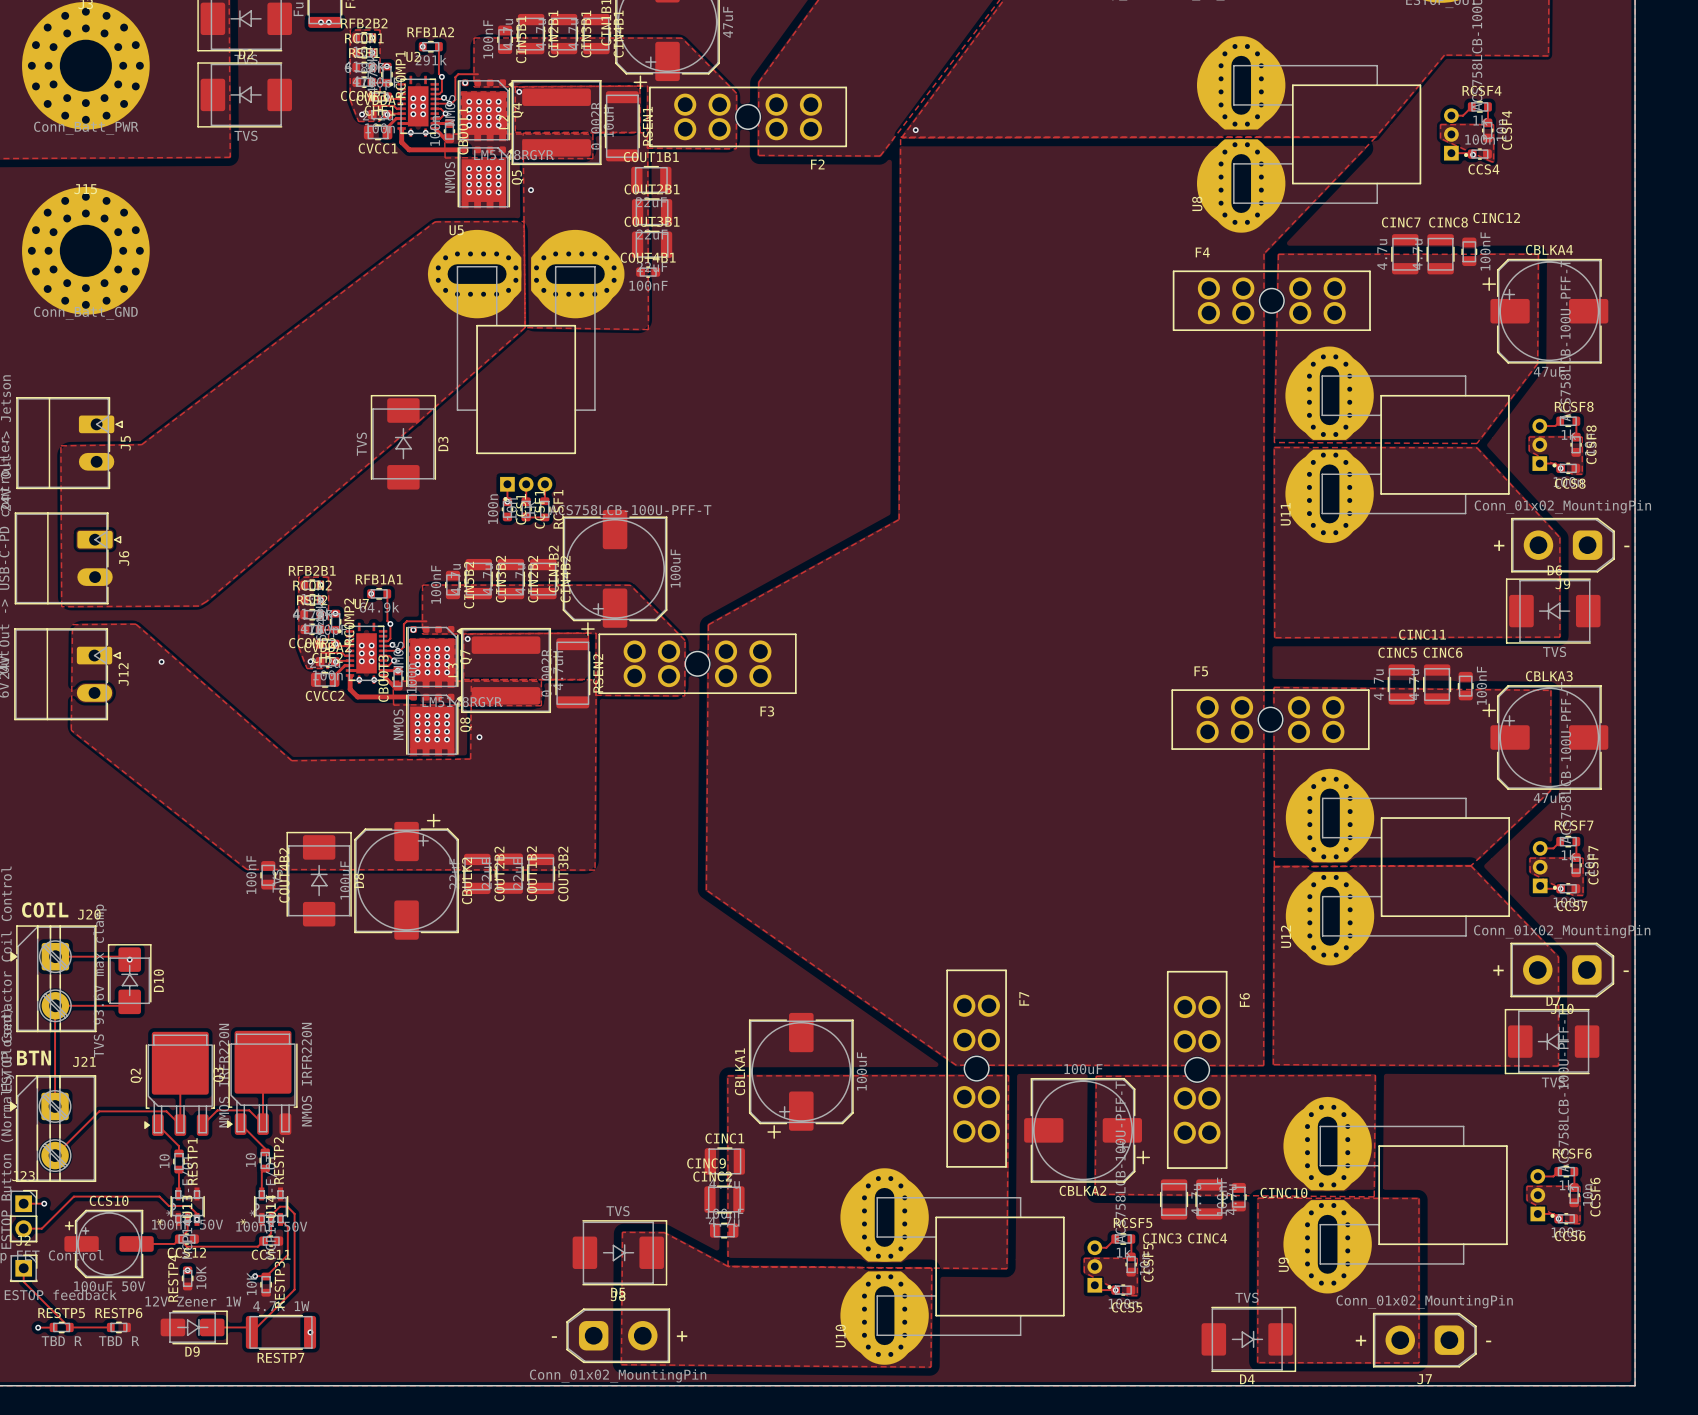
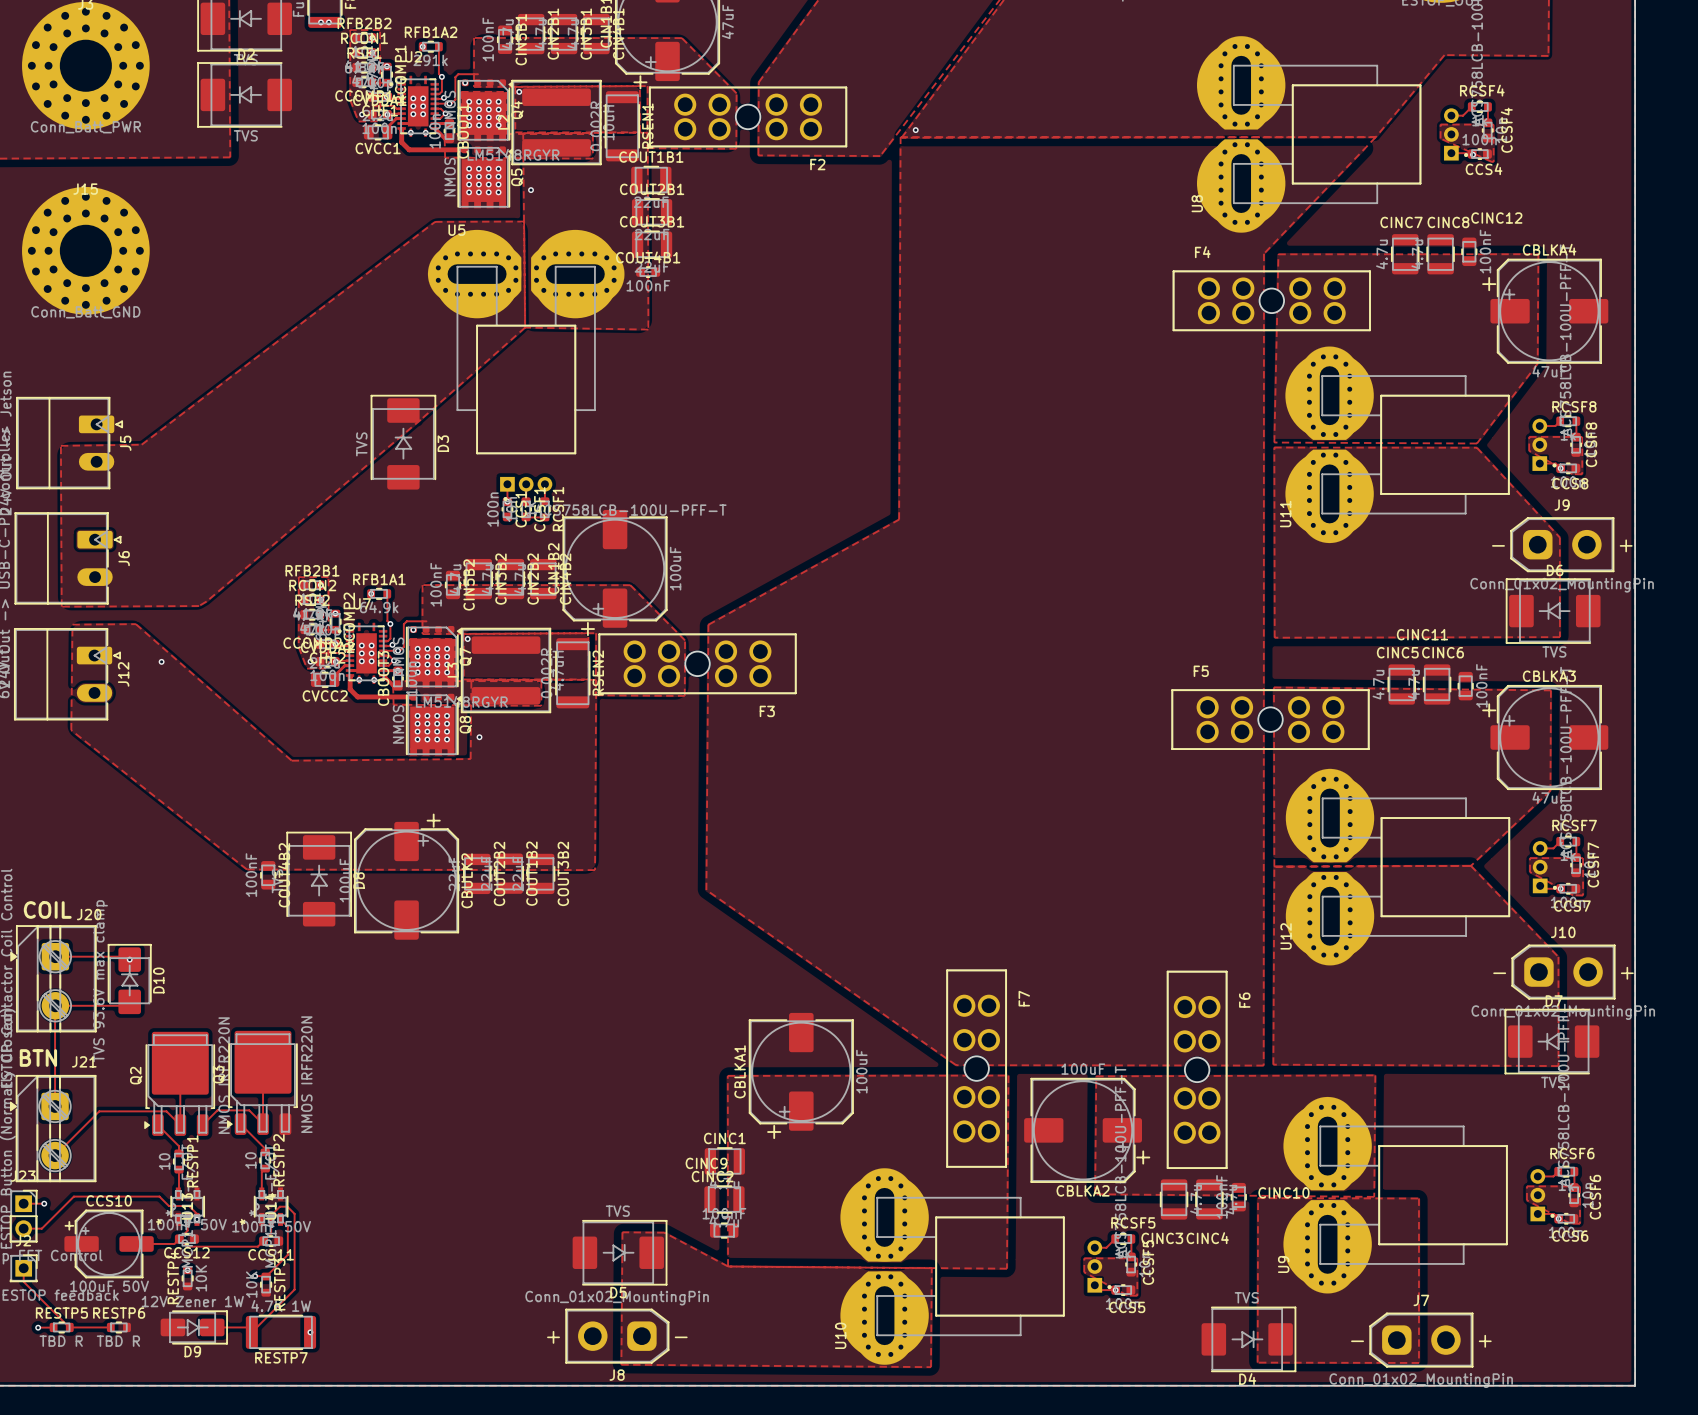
J9 rotation: 0° (1563, 545) -> 180° (1562, 544)
J10 rotation: 0° (1562, 969) -> 180° (1563, 972)
J8 rotation: 0° (618, 1335) -> 180° (617, 1336)
J7 rotation: 0° (1424, 1340) -> 180° (1421, 1340)

